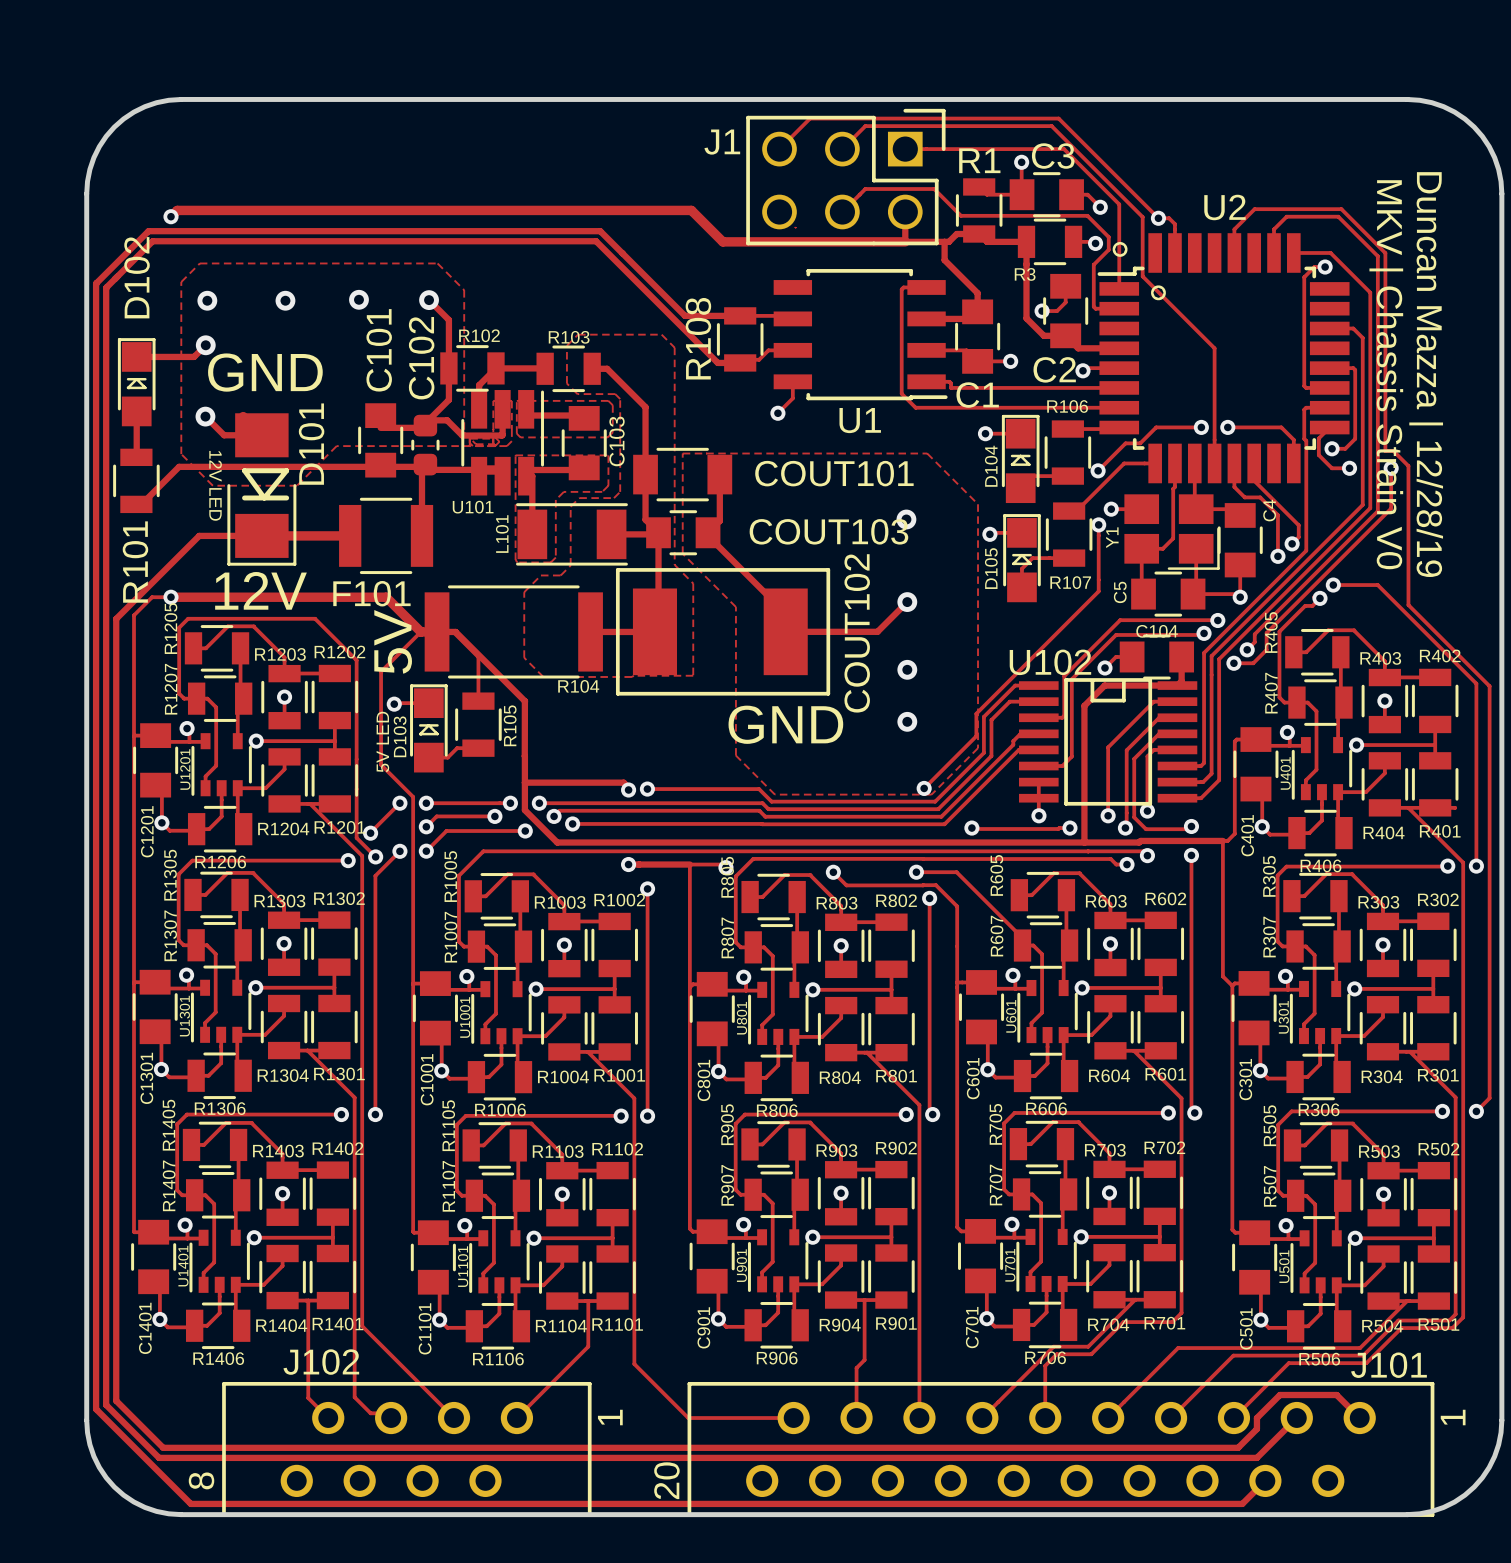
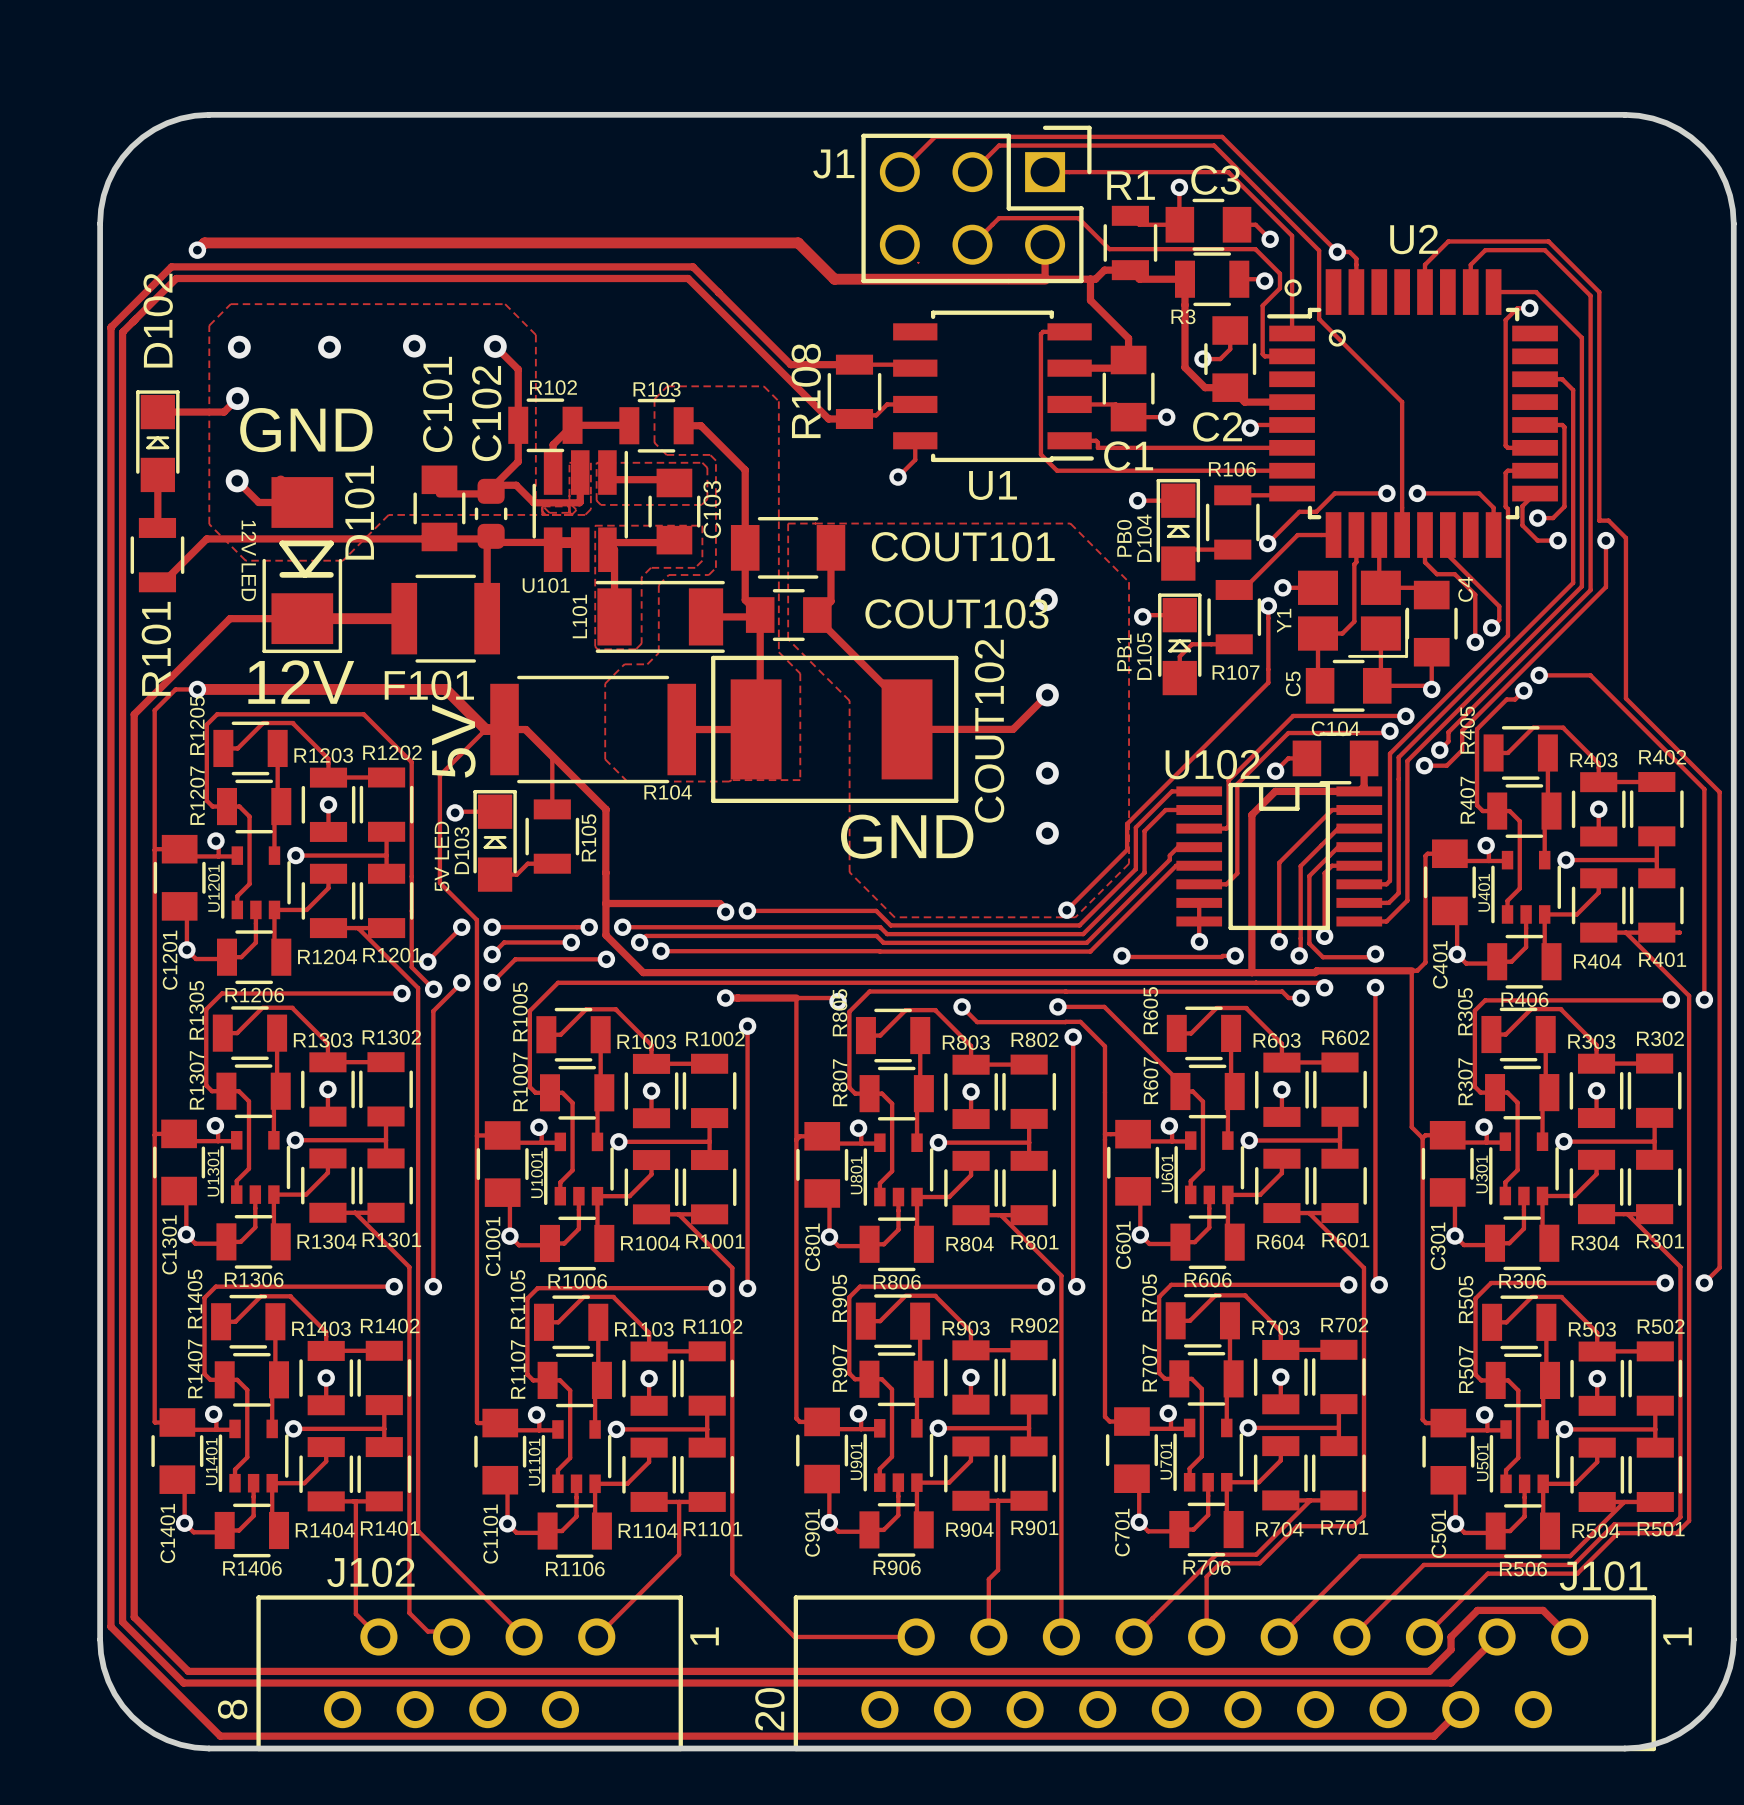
text: MKV | Chassis Strain V0 (1386, 374) -> none
text: Duncan Mazza | 12/28/19 (1426, 374) -> none
text: none -> PB0 (1124, 538)
text: none -> PB1 (1124, 652)

